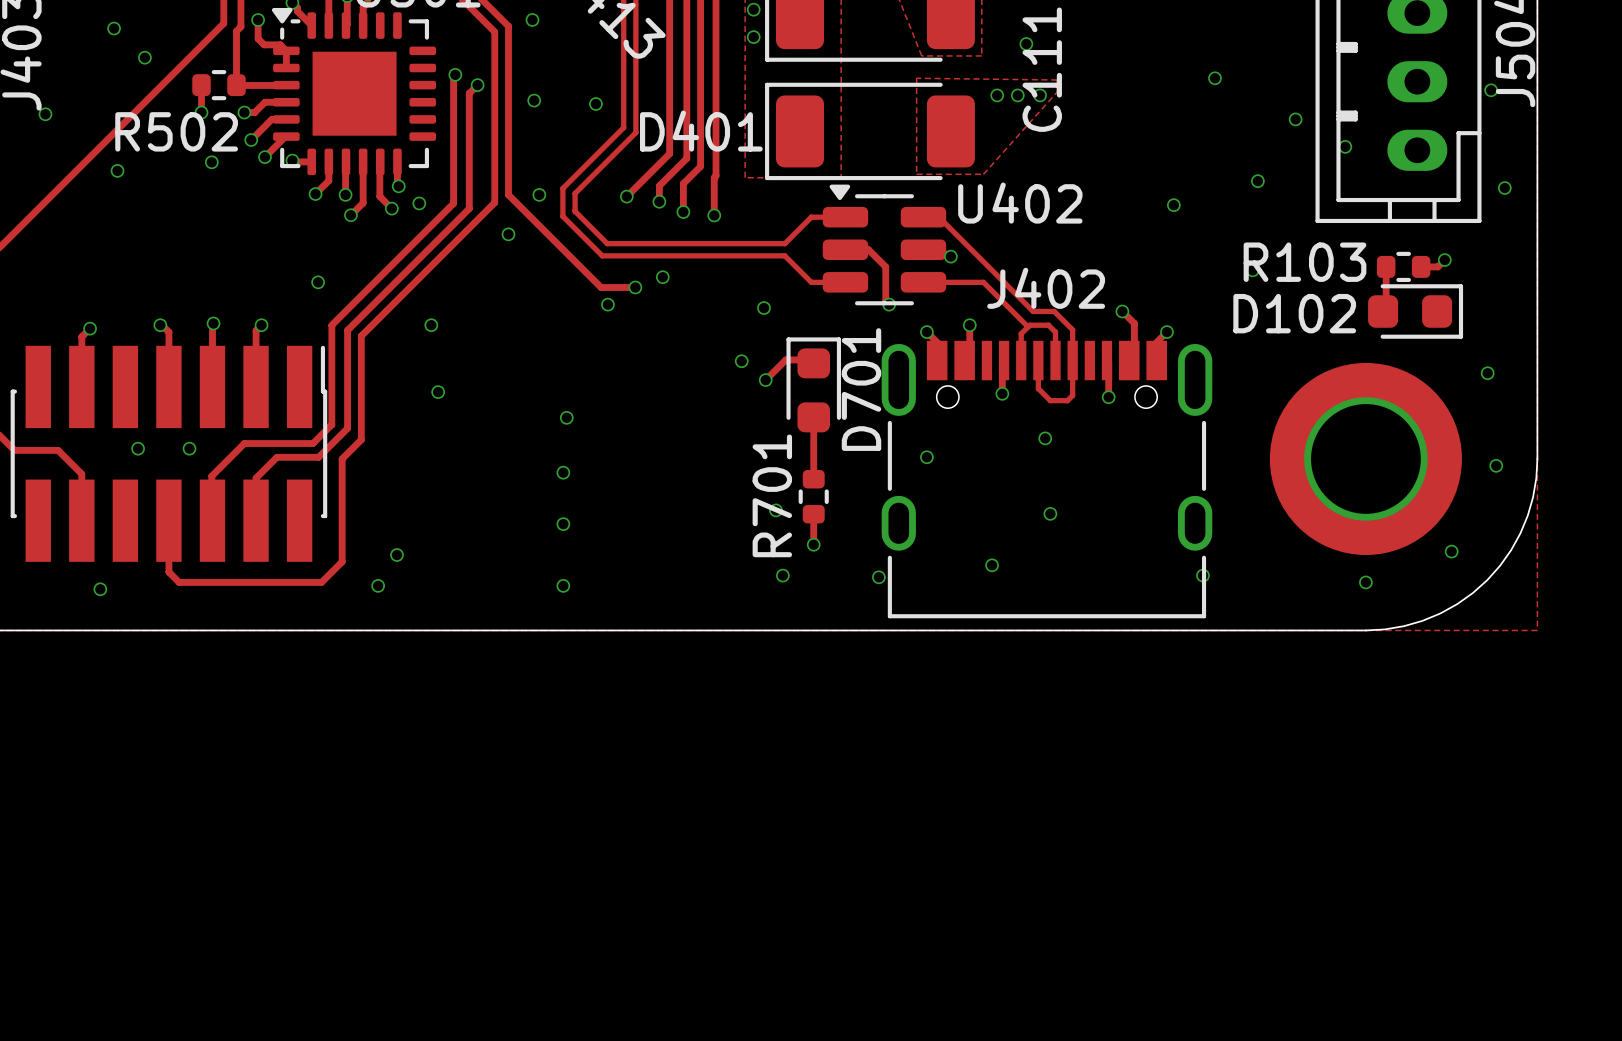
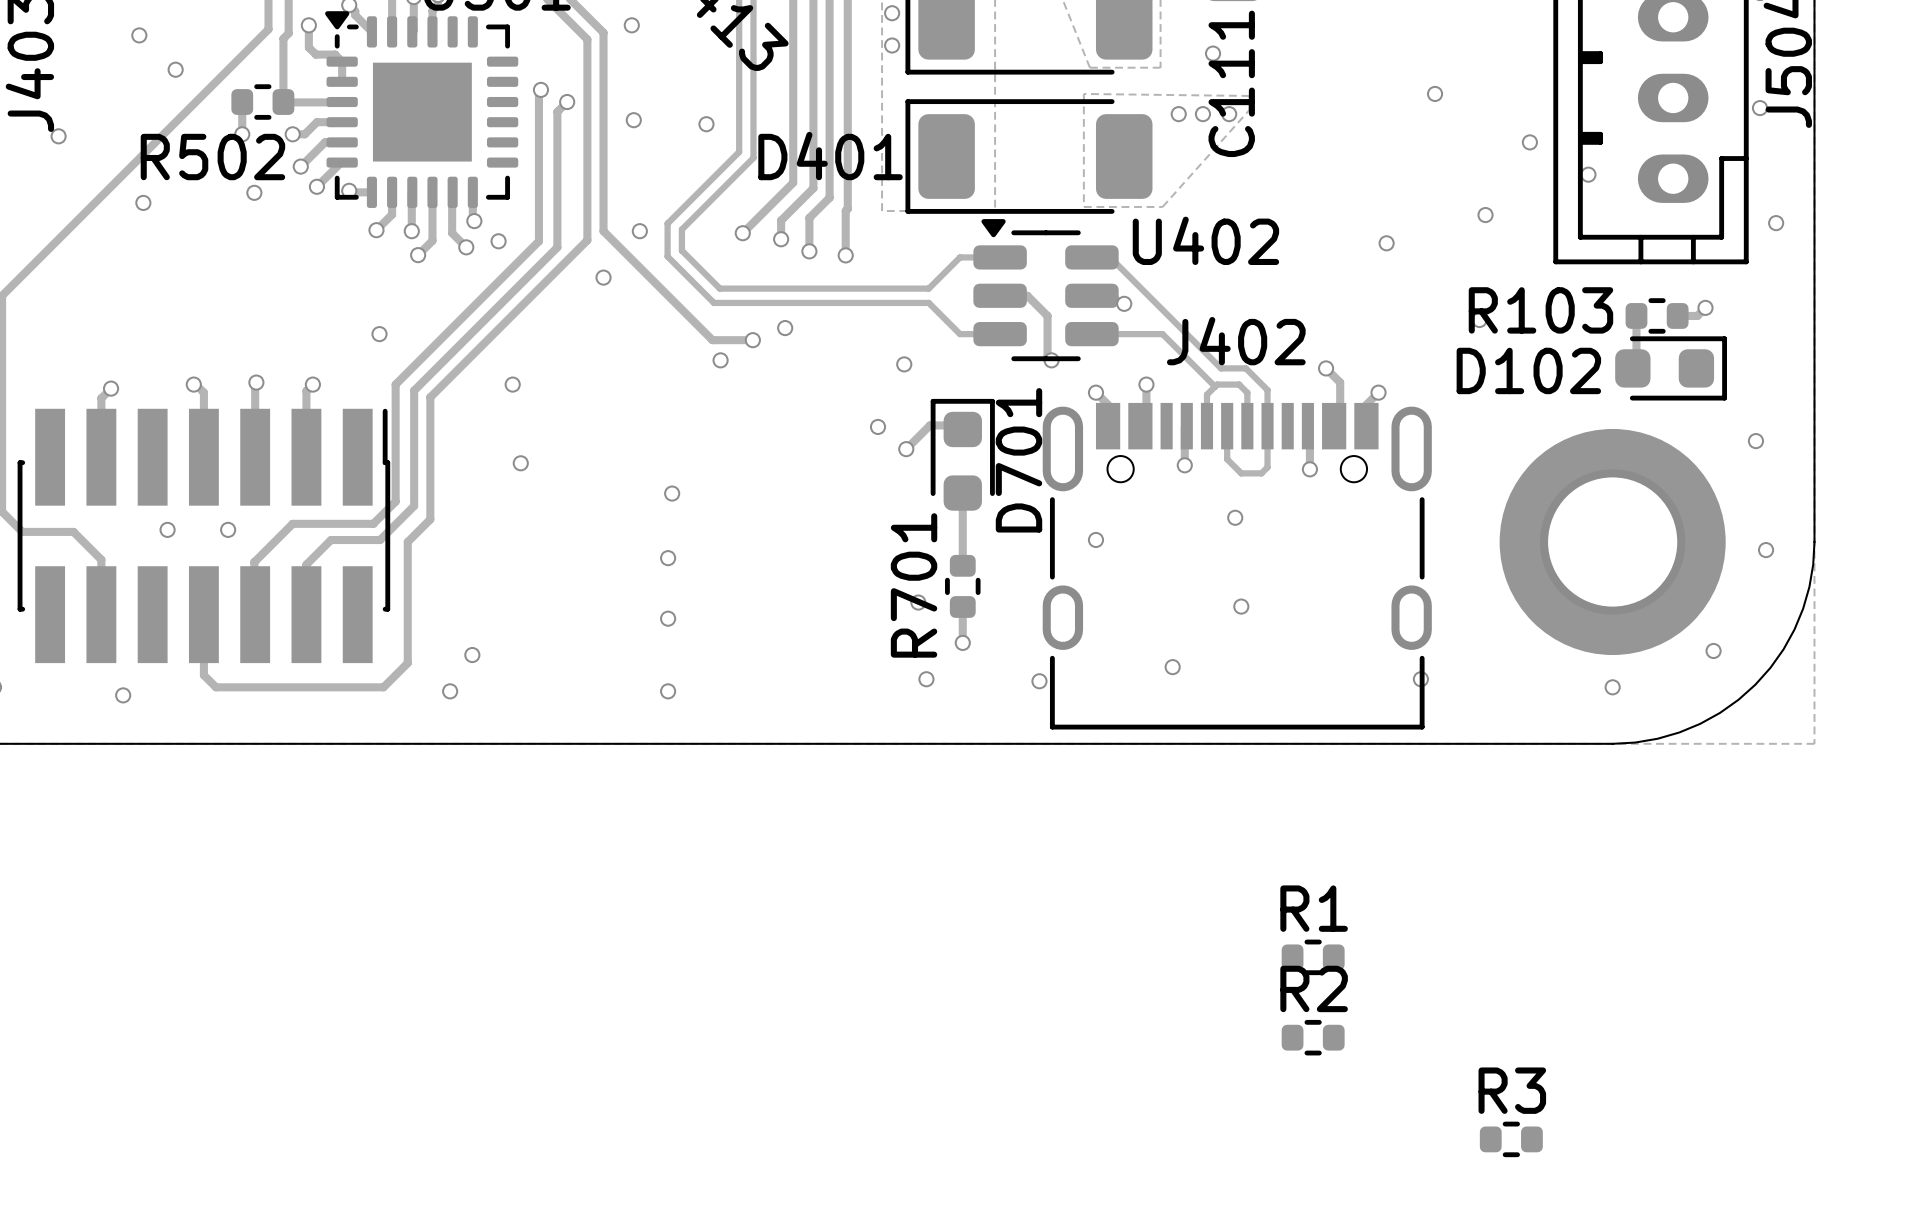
R1: none -> (1313, 957)
R2: none -> (1313, 1037)
R3: none -> (1511, 1139)

